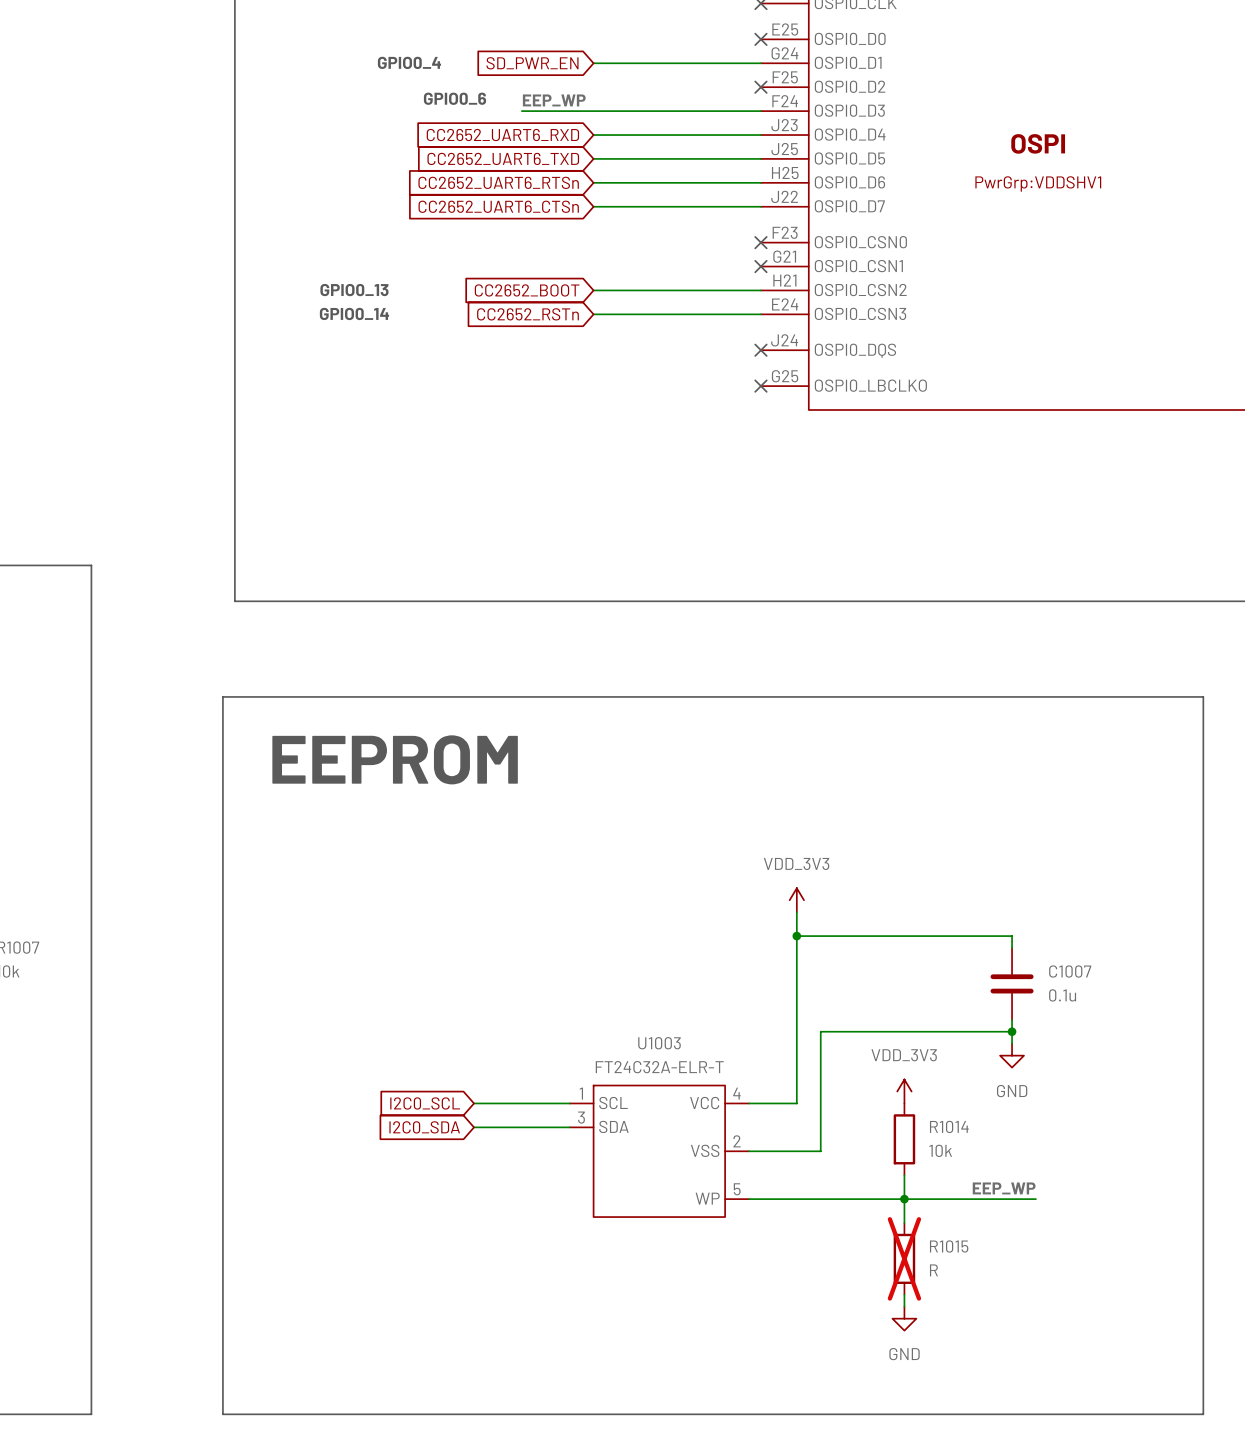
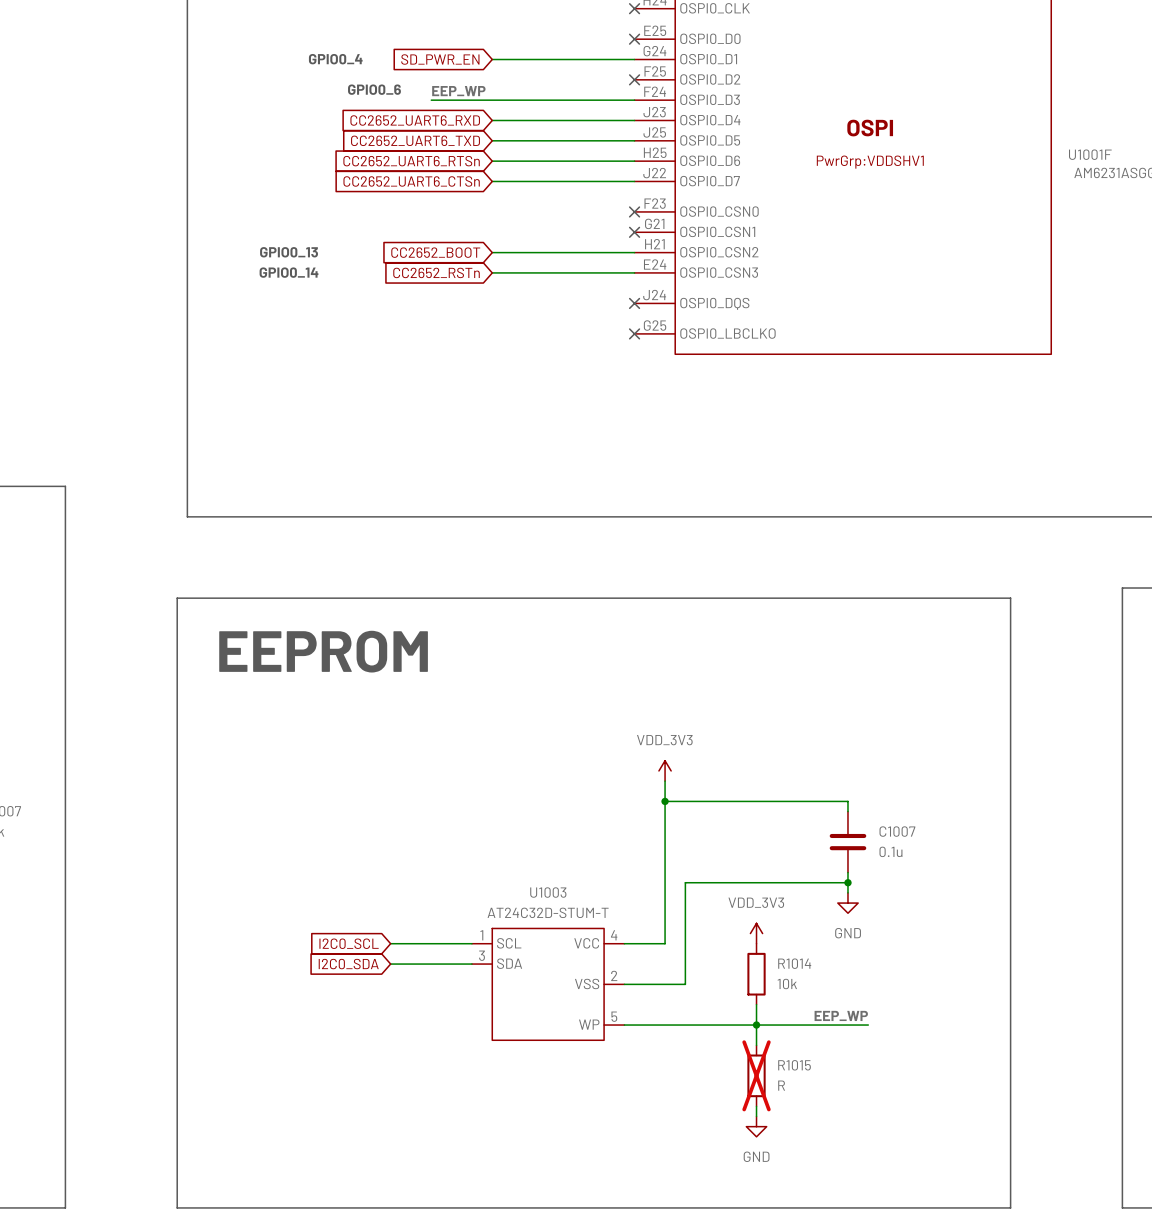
U1003 value: FT24C32A-ELR-T (659, 1067) -> AT24C32D-STUM-T (548, 912)

